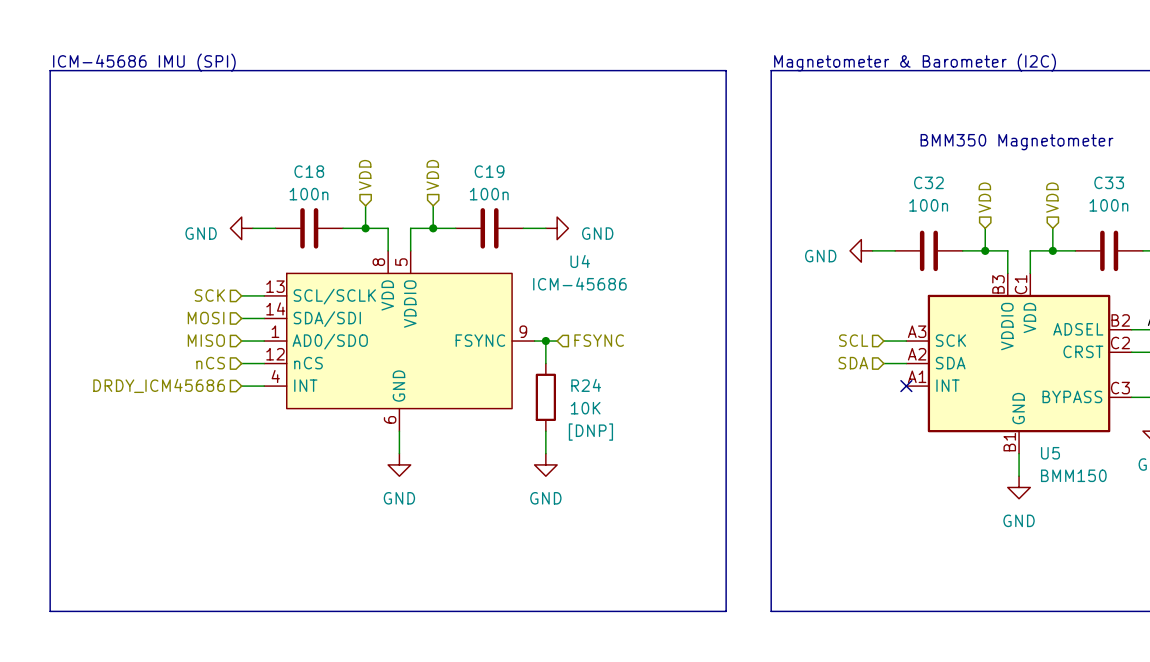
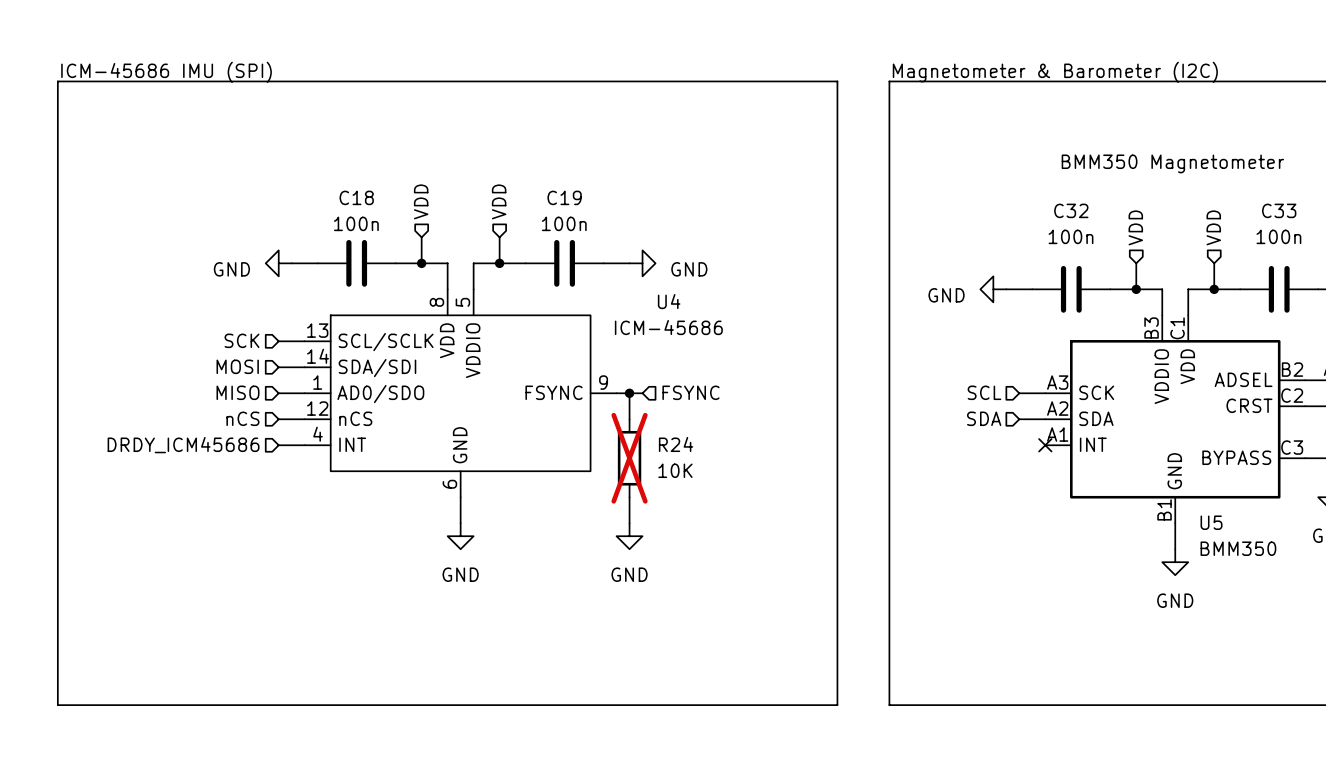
R24 do-not-place cross: none -> (629, 458)
R24 text: [DNP] (590, 432) -> none
U5 value: BMM150 (1073, 475) -> BMM350 (1238, 548)

